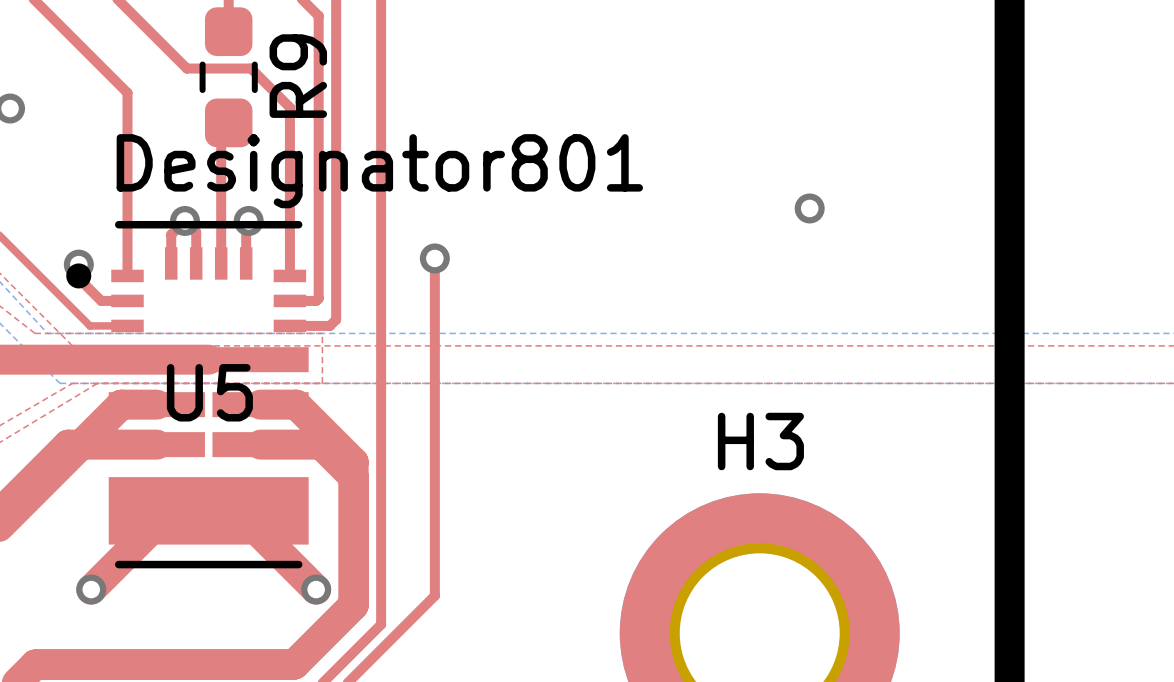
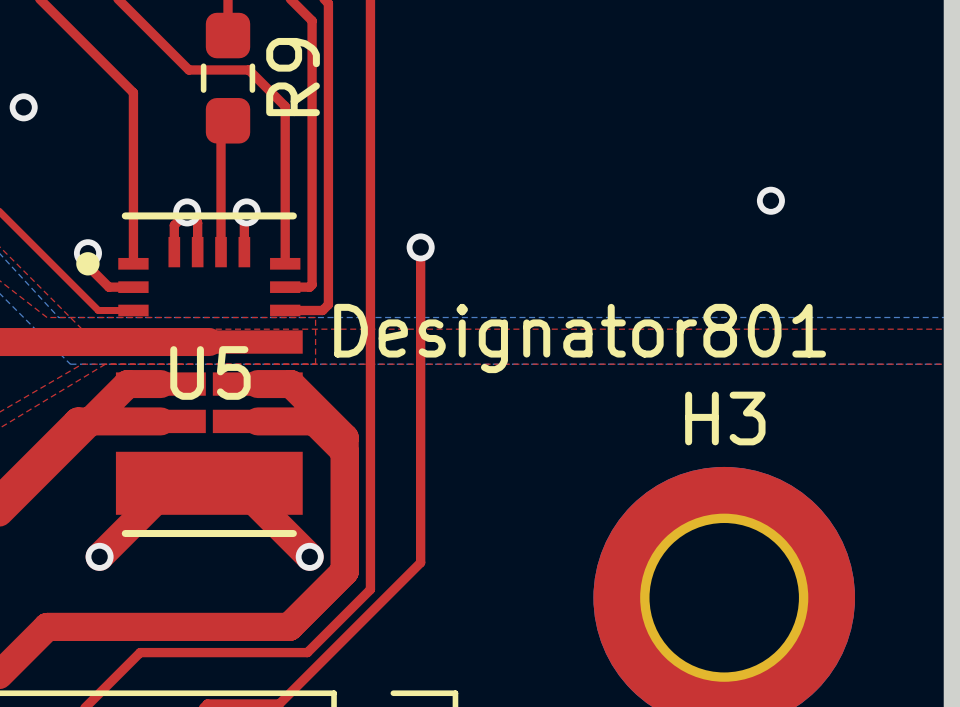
U5 text position: Designator801 (379, 171) -> Designator801 (580, 338)

